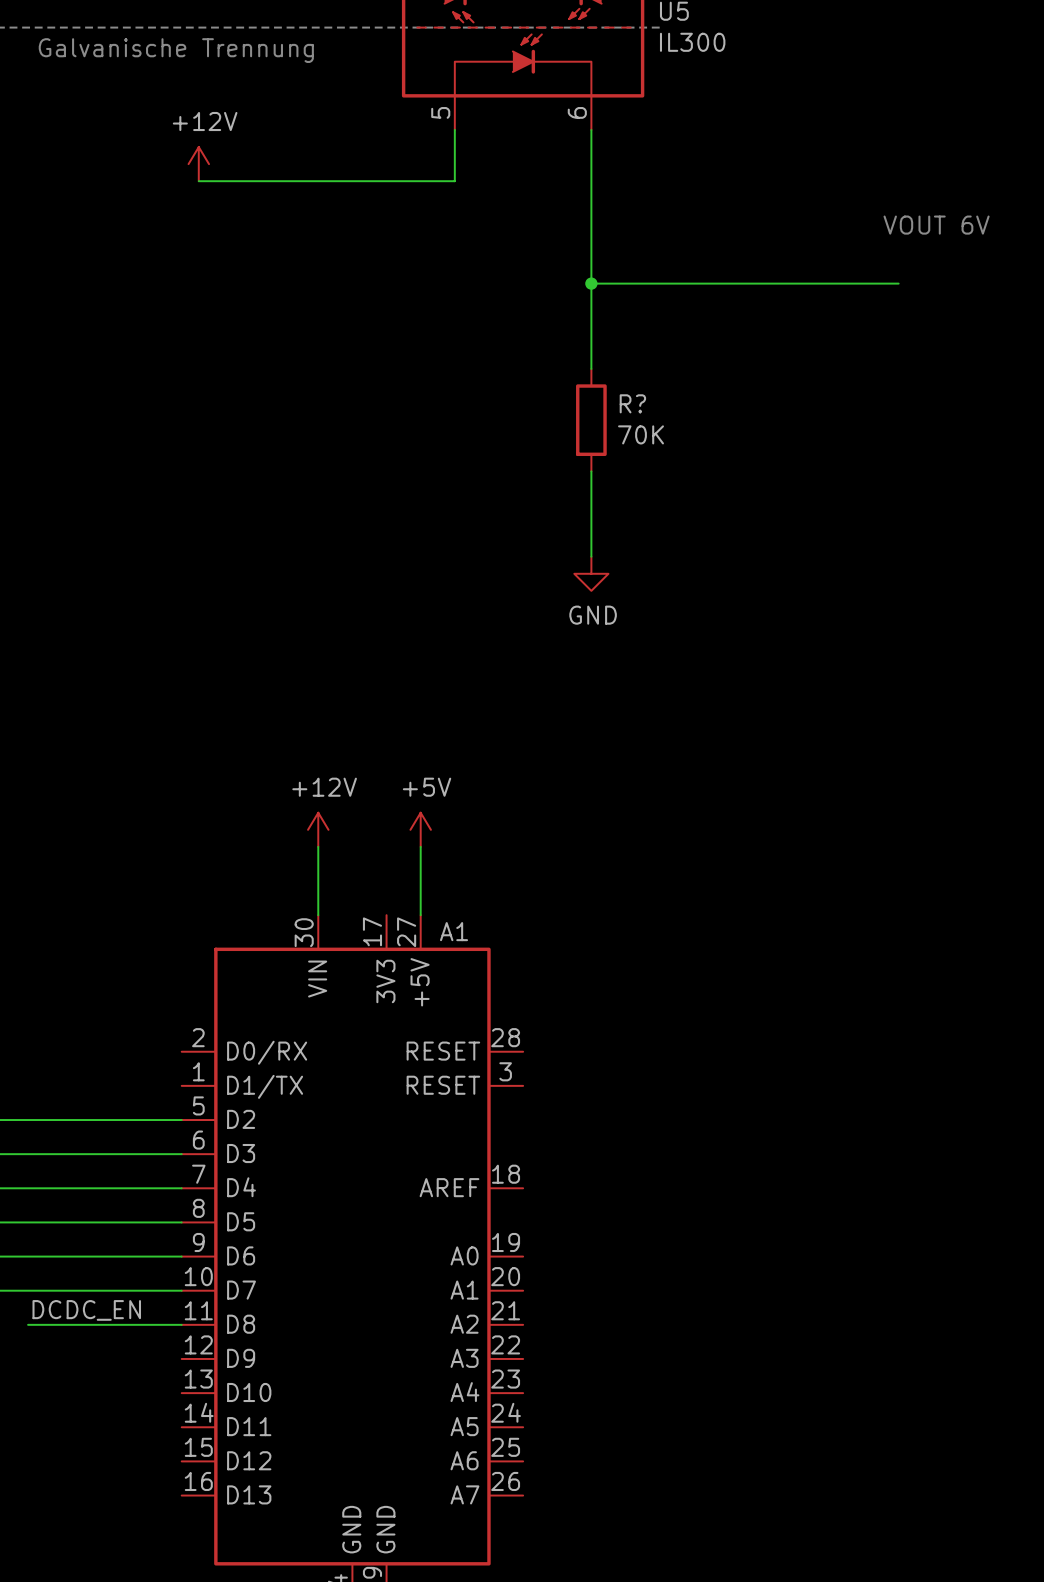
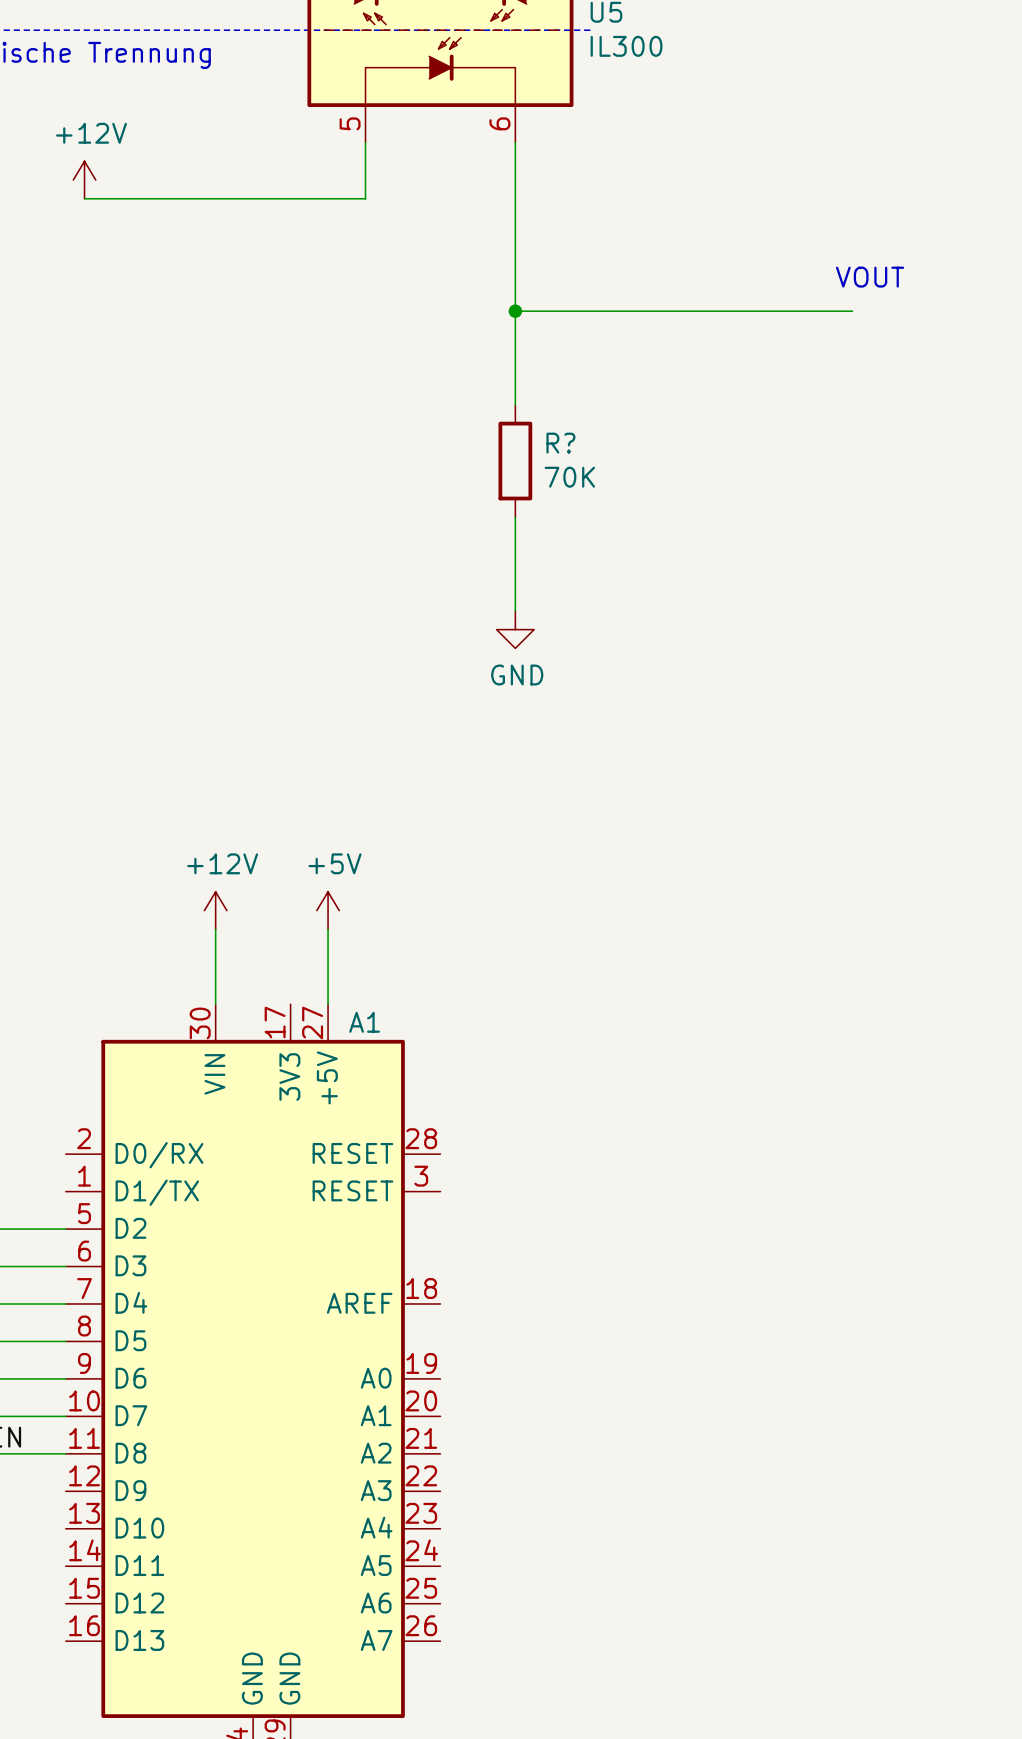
text: VOUT 6V (936, 225) -> VOUT (870, 277)

